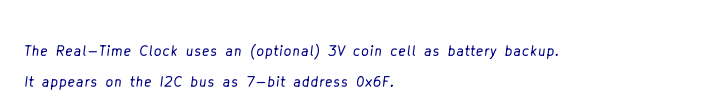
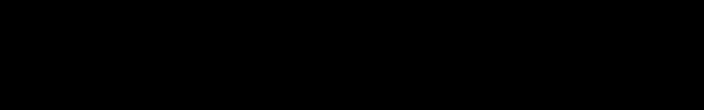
text: The Real-Time Clock uses an (optional) 3V coin cell as battery backup. (291, 51) -> none
text: It appears on the I2C bus as 7-bit address 0x6F. (209, 82) -> none

